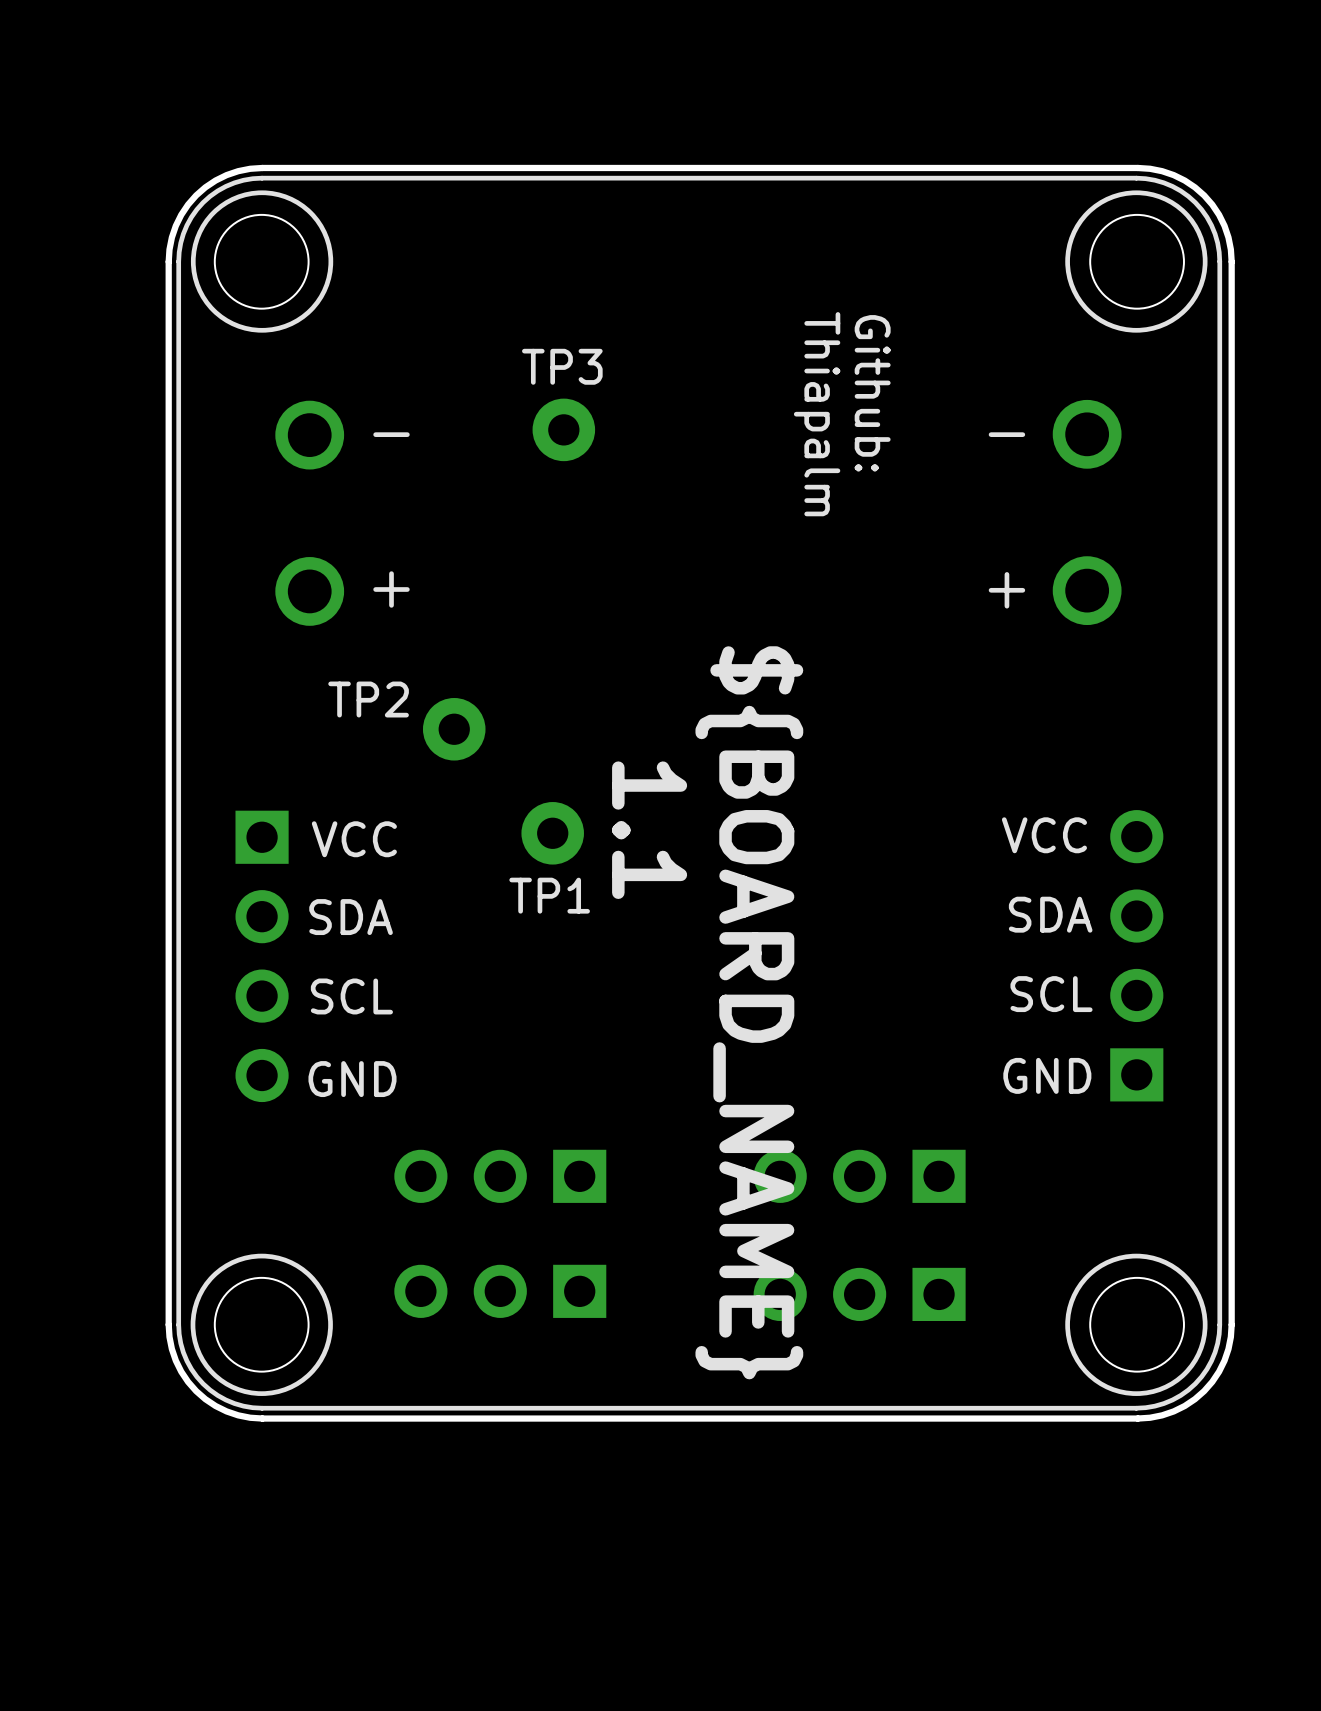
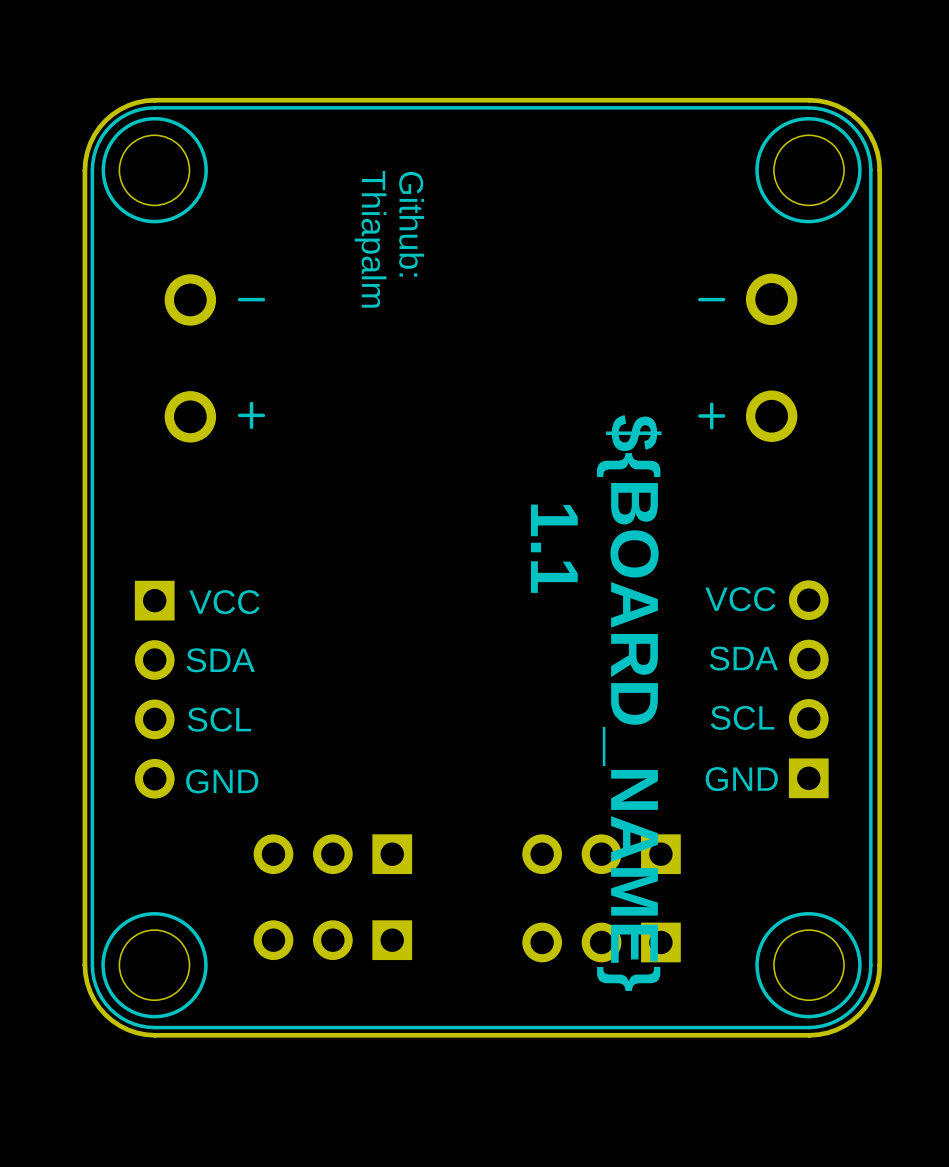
text position: Github: (872, 393) -> Github: (411, 224)
text position: Thiapalm (817, 414) -> Thiapalm (370, 239)
TP3: (563, 429) -> none
TP2: (454, 729) -> none
text position: 1.1 (649, 830) -> 1.1 (554, 548)
TP1: (552, 833) -> none
text position: ${BOARD_NAME} (749, 1012) -> ${BOARD_NAME} (629, 703)

